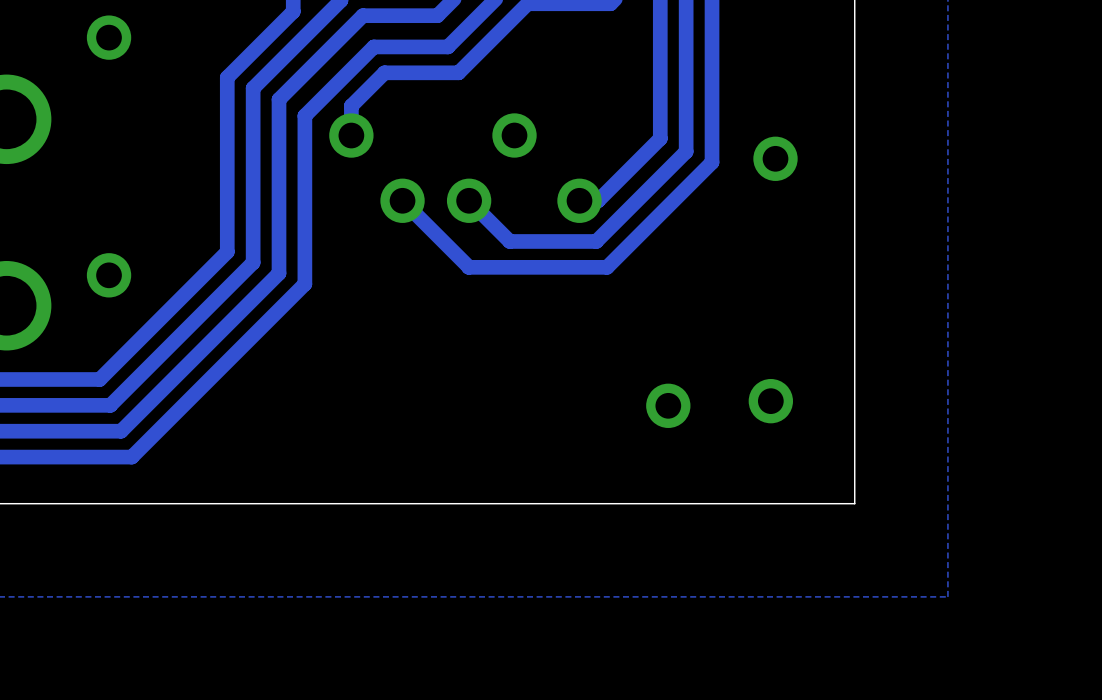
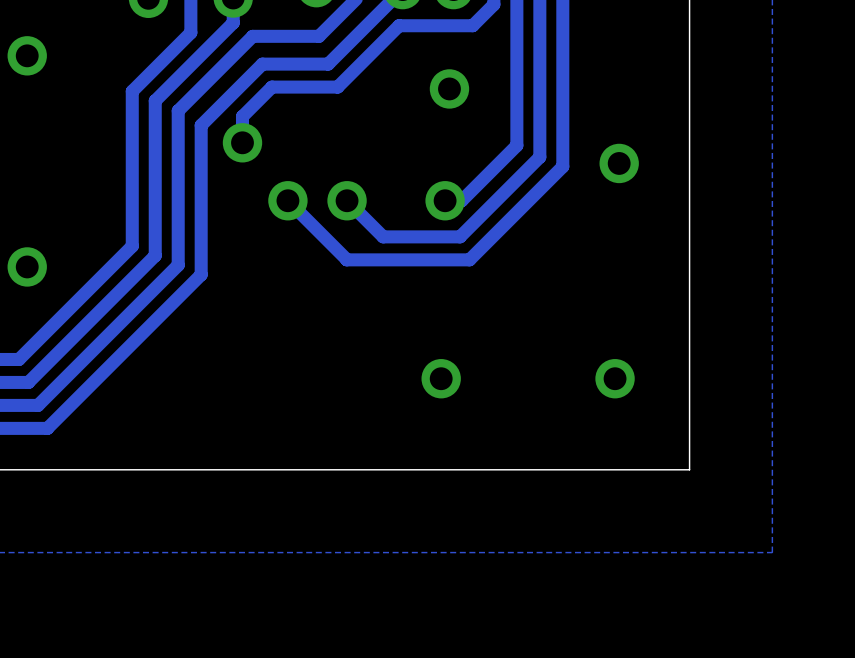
via position: (514, 135) -> (449, 88)
via position: (668, 405) -> (441, 378)

